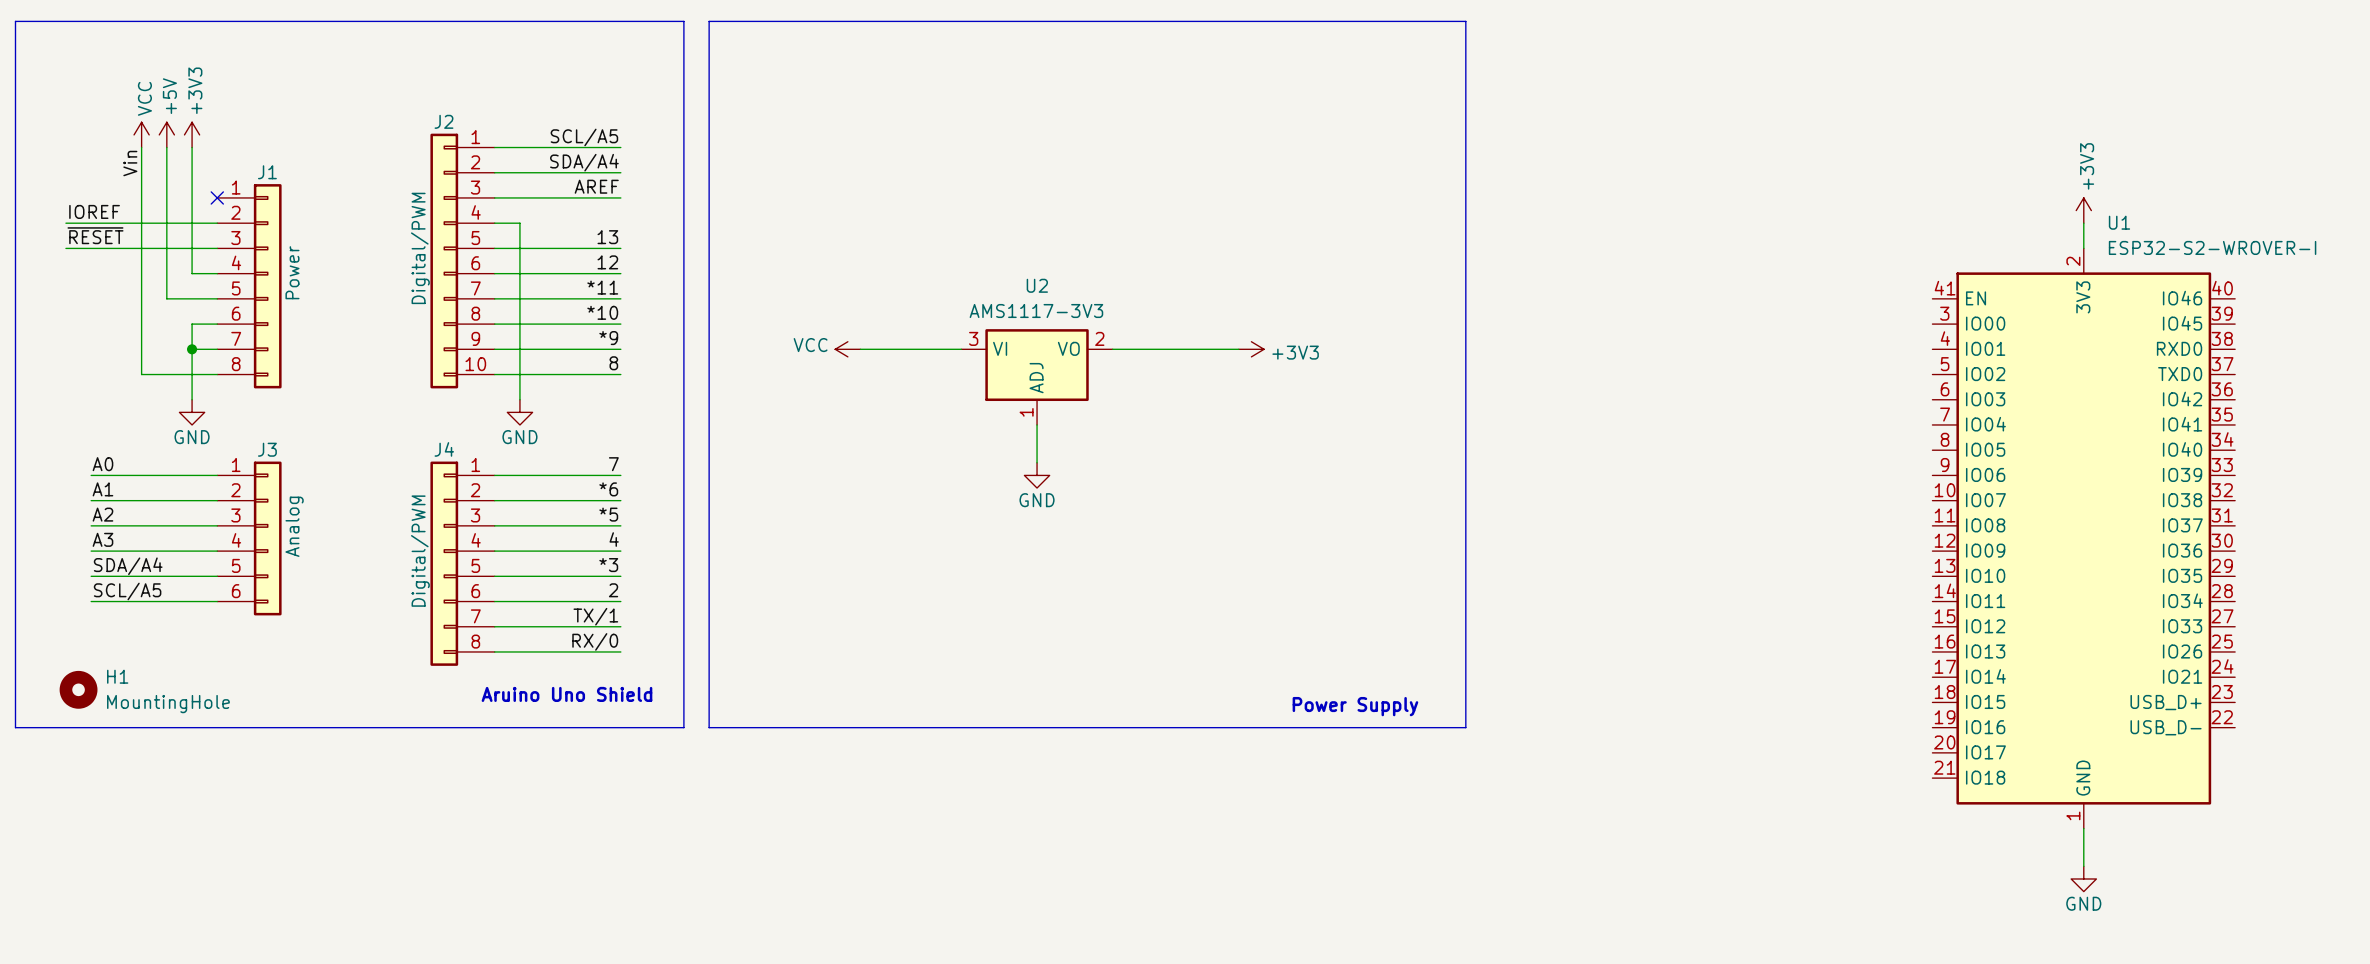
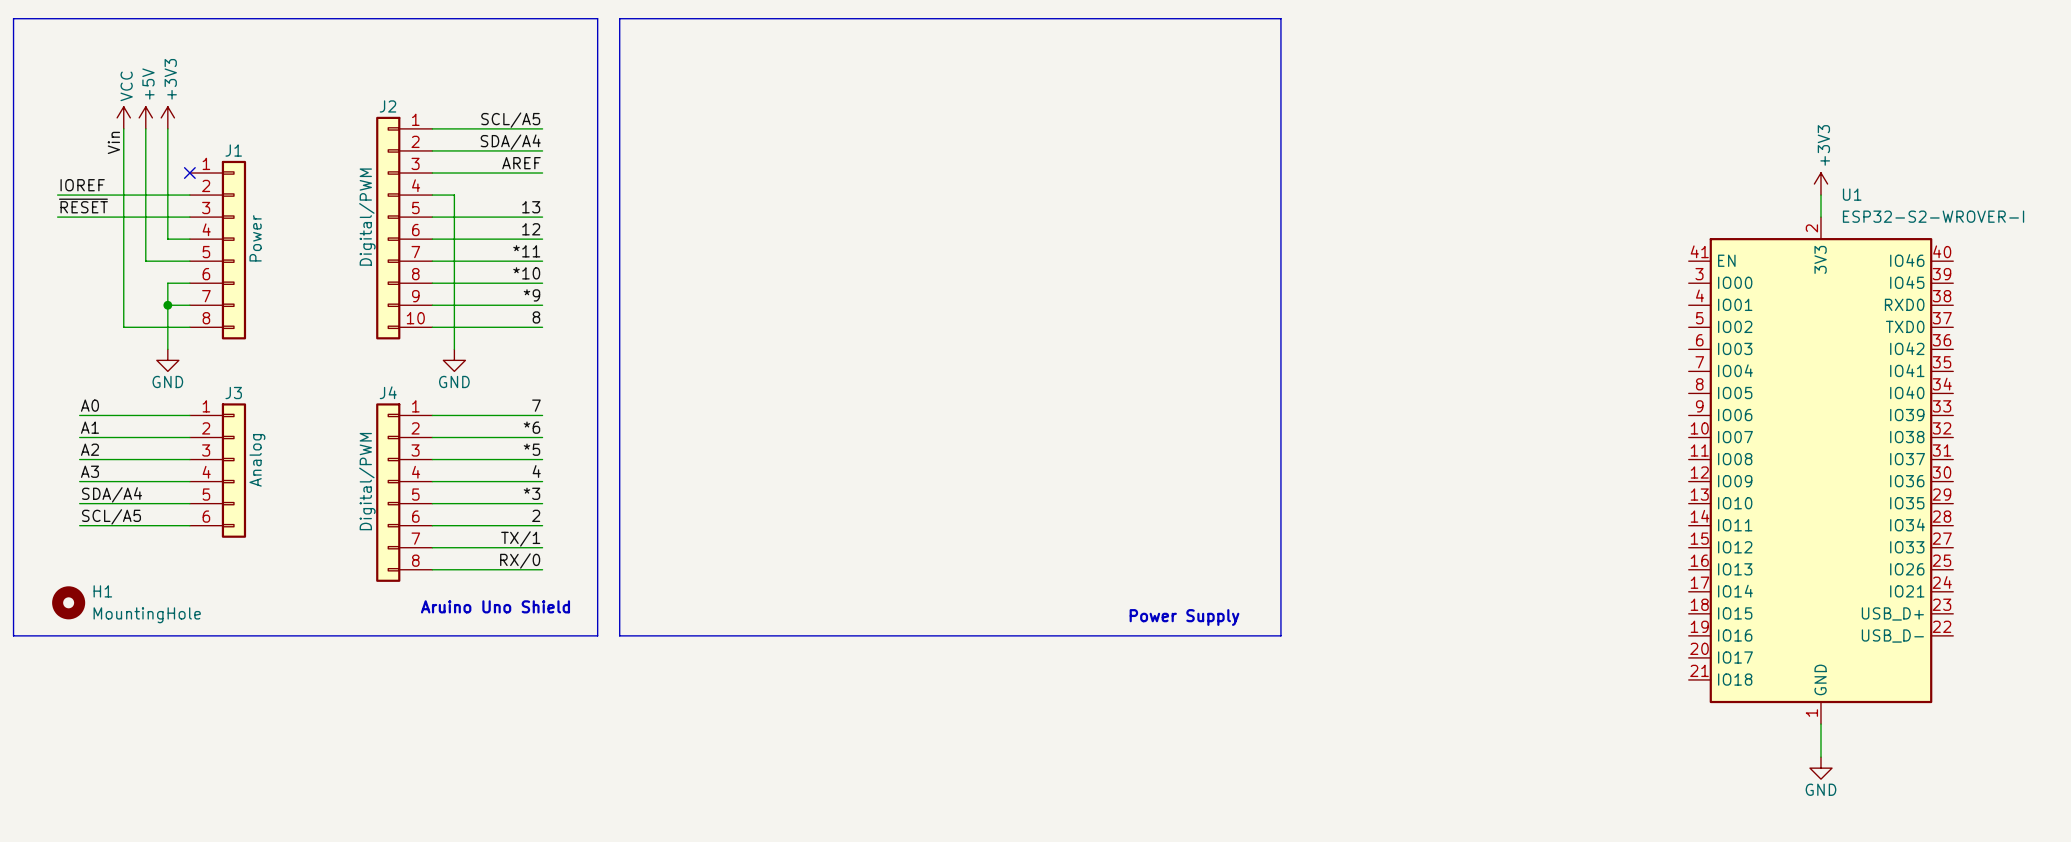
power symbol: VCC (847, 349) -> none
wire: (860, 349) (961, 349) -> none
wire: (1112, 349) (1238, 349) -> none
power symbol: +3V3 (1251, 349) -> none
U2: AMS1117-3V3 (1037, 377) -> none
wire: (1037, 424) (1037, 462) -> none
power symbol: GND (1037, 475) -> none

